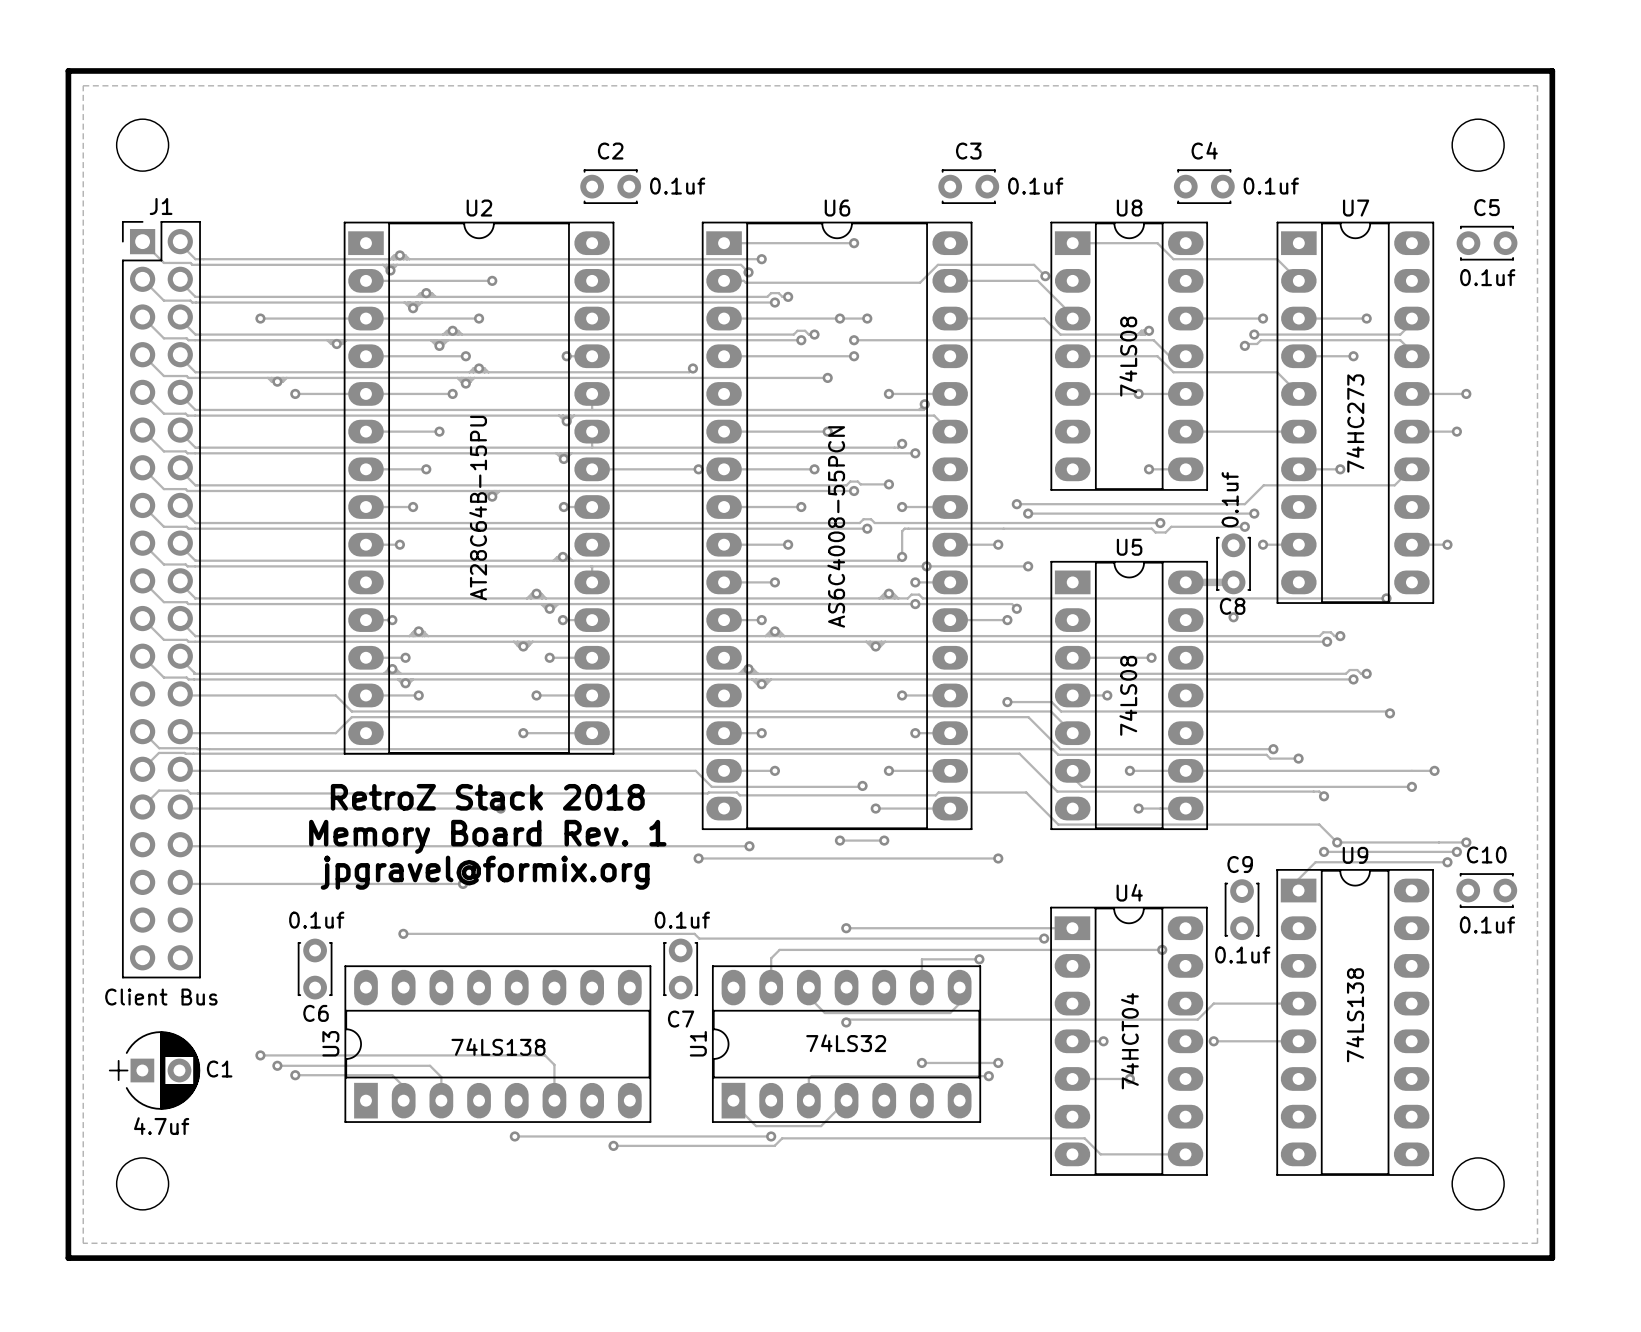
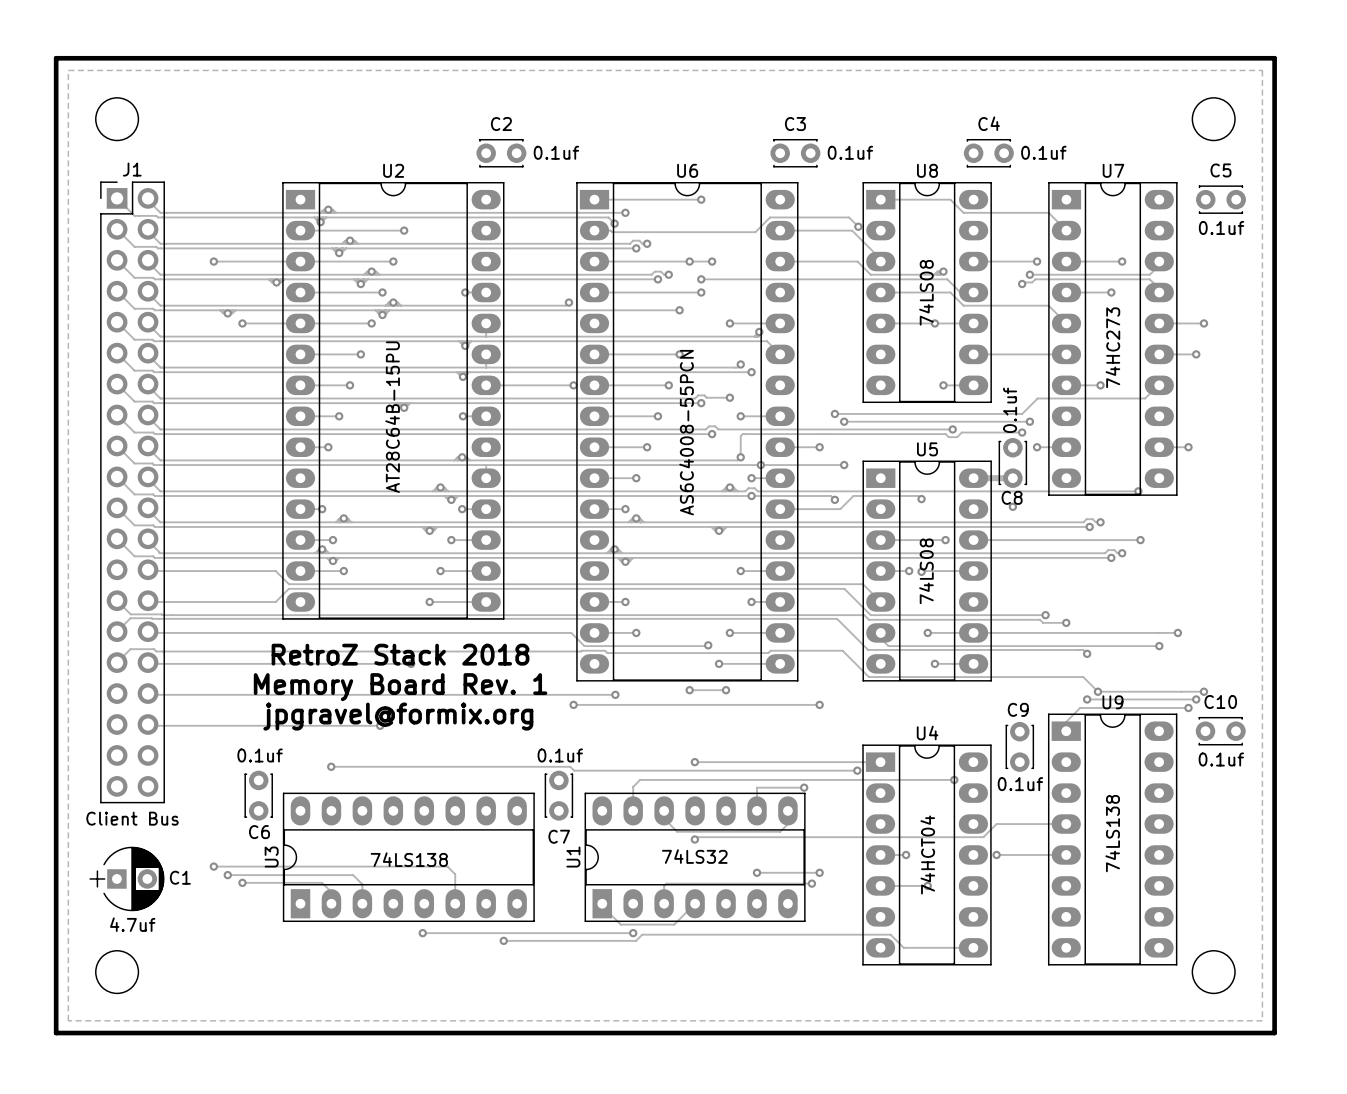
track: none -> (921, 499) (918, 495) (853, 495) (840, 509) (827, 509)
via: none -> (921, 499)
via: (1007, 620) -> none
track: none -> (973, 540) (1140, 540)
track: none -> (973, 571) (921, 571)
via: none -> (921, 571)
track: (1007, 702) (1051, 702) (1061, 711) (1388, 711) (1389, 713) -> none
via: (1007, 702) -> none
via position: (1389, 713) -> (1140, 540)

